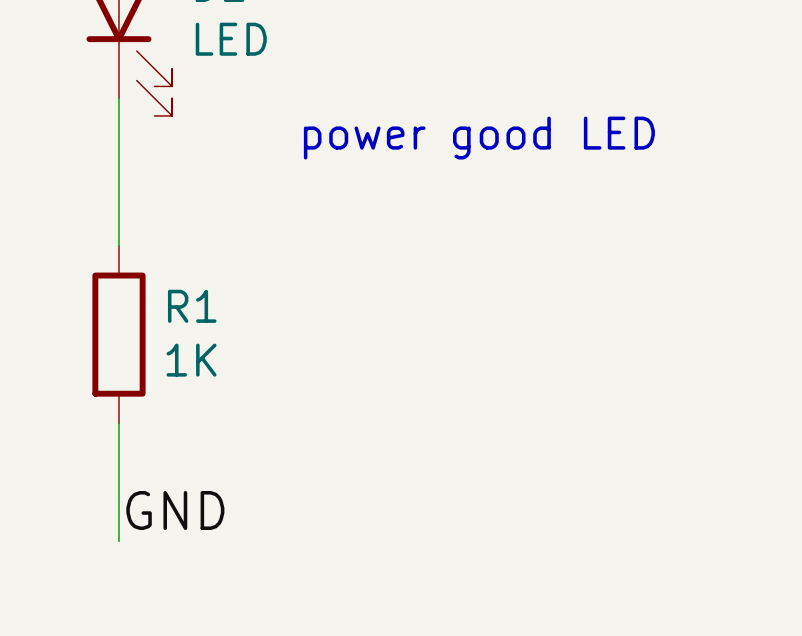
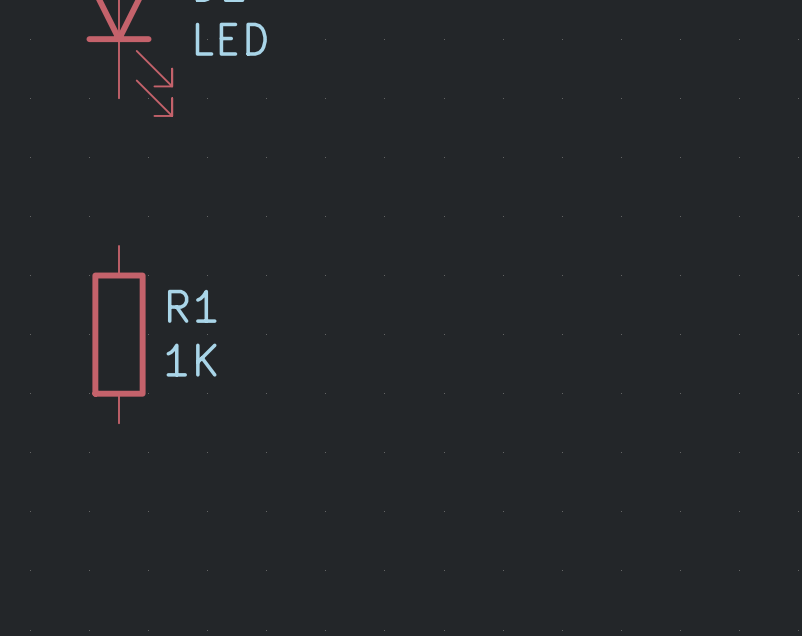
wire: (118, 98) (118, 245) -> none
text: power good LED (479, 138) -> none
wire: (118, 423) (118, 541) -> none
label: GND (175, 510) -> none

